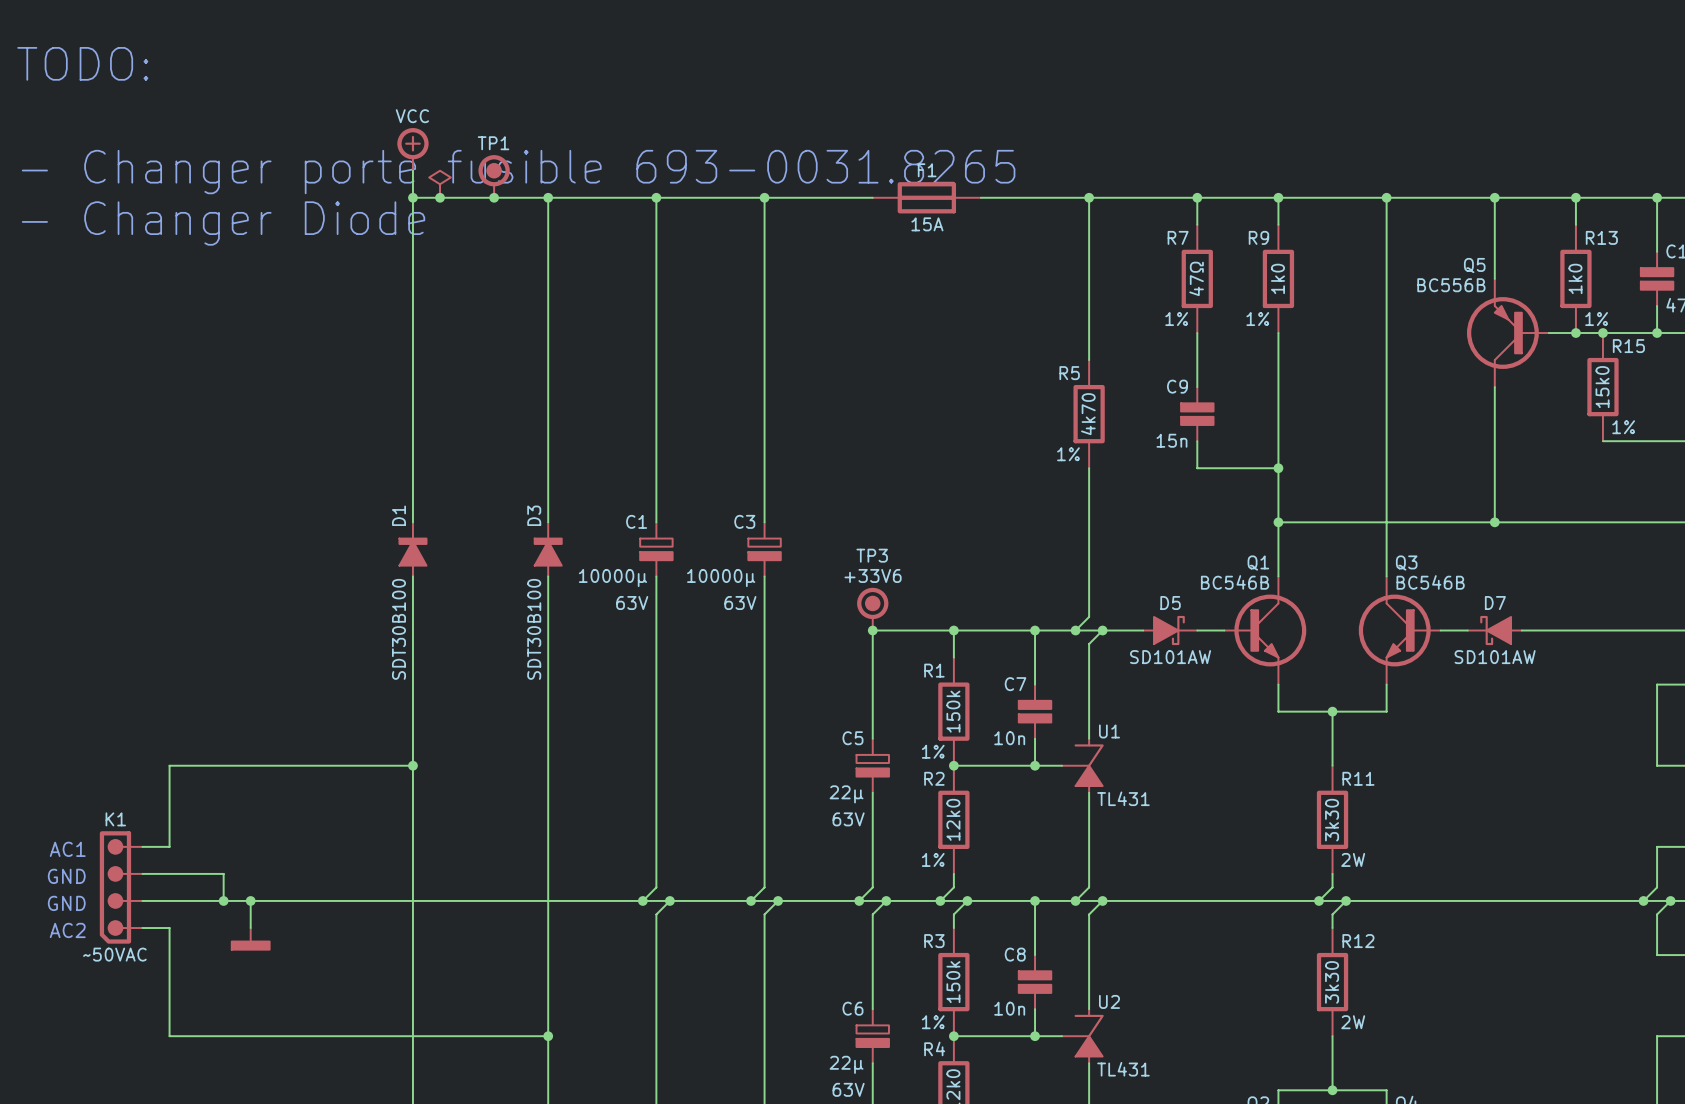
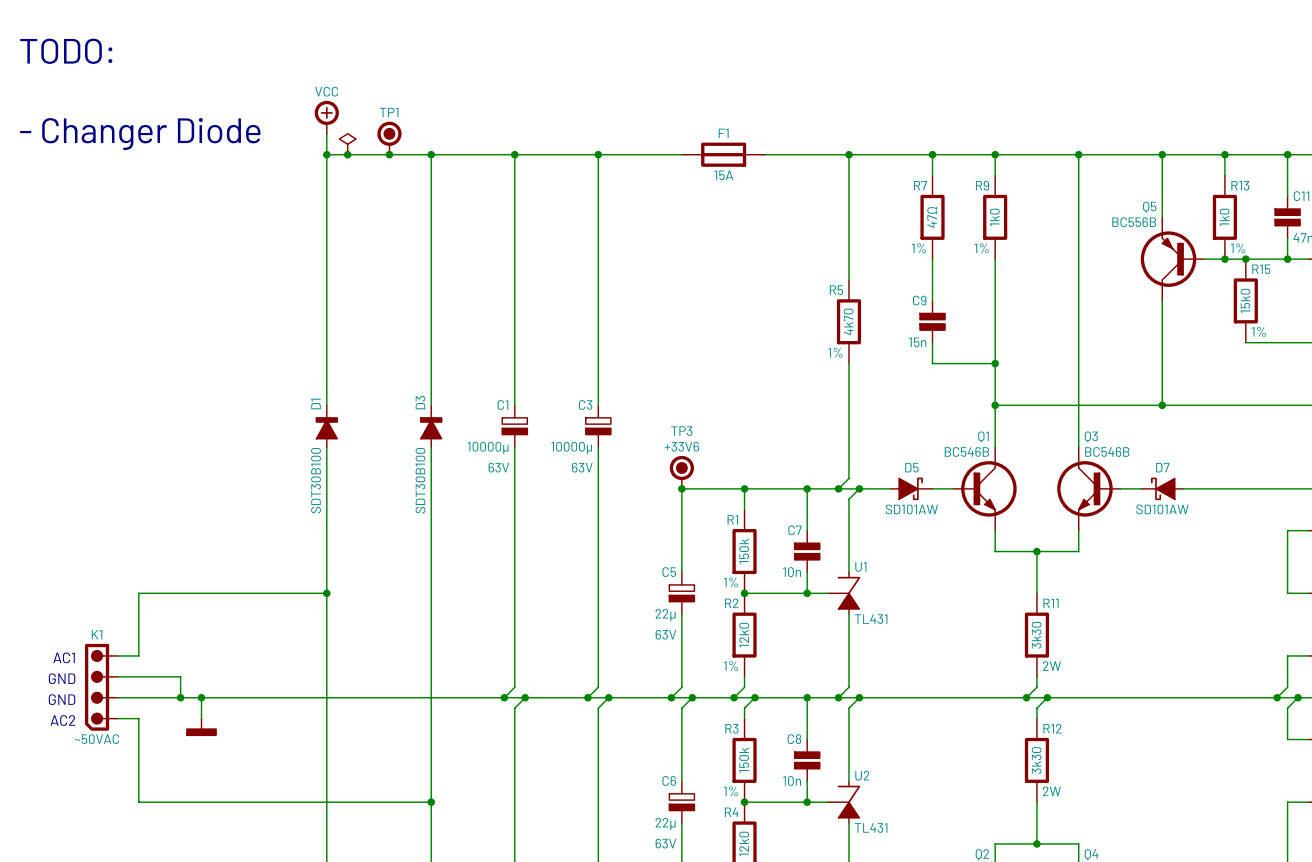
text: - Changer porte fusible 693-0031.8265 (518, 172) -> - Changer Diode (140, 134)
text: - Changer Diode (223, 223) -> none

